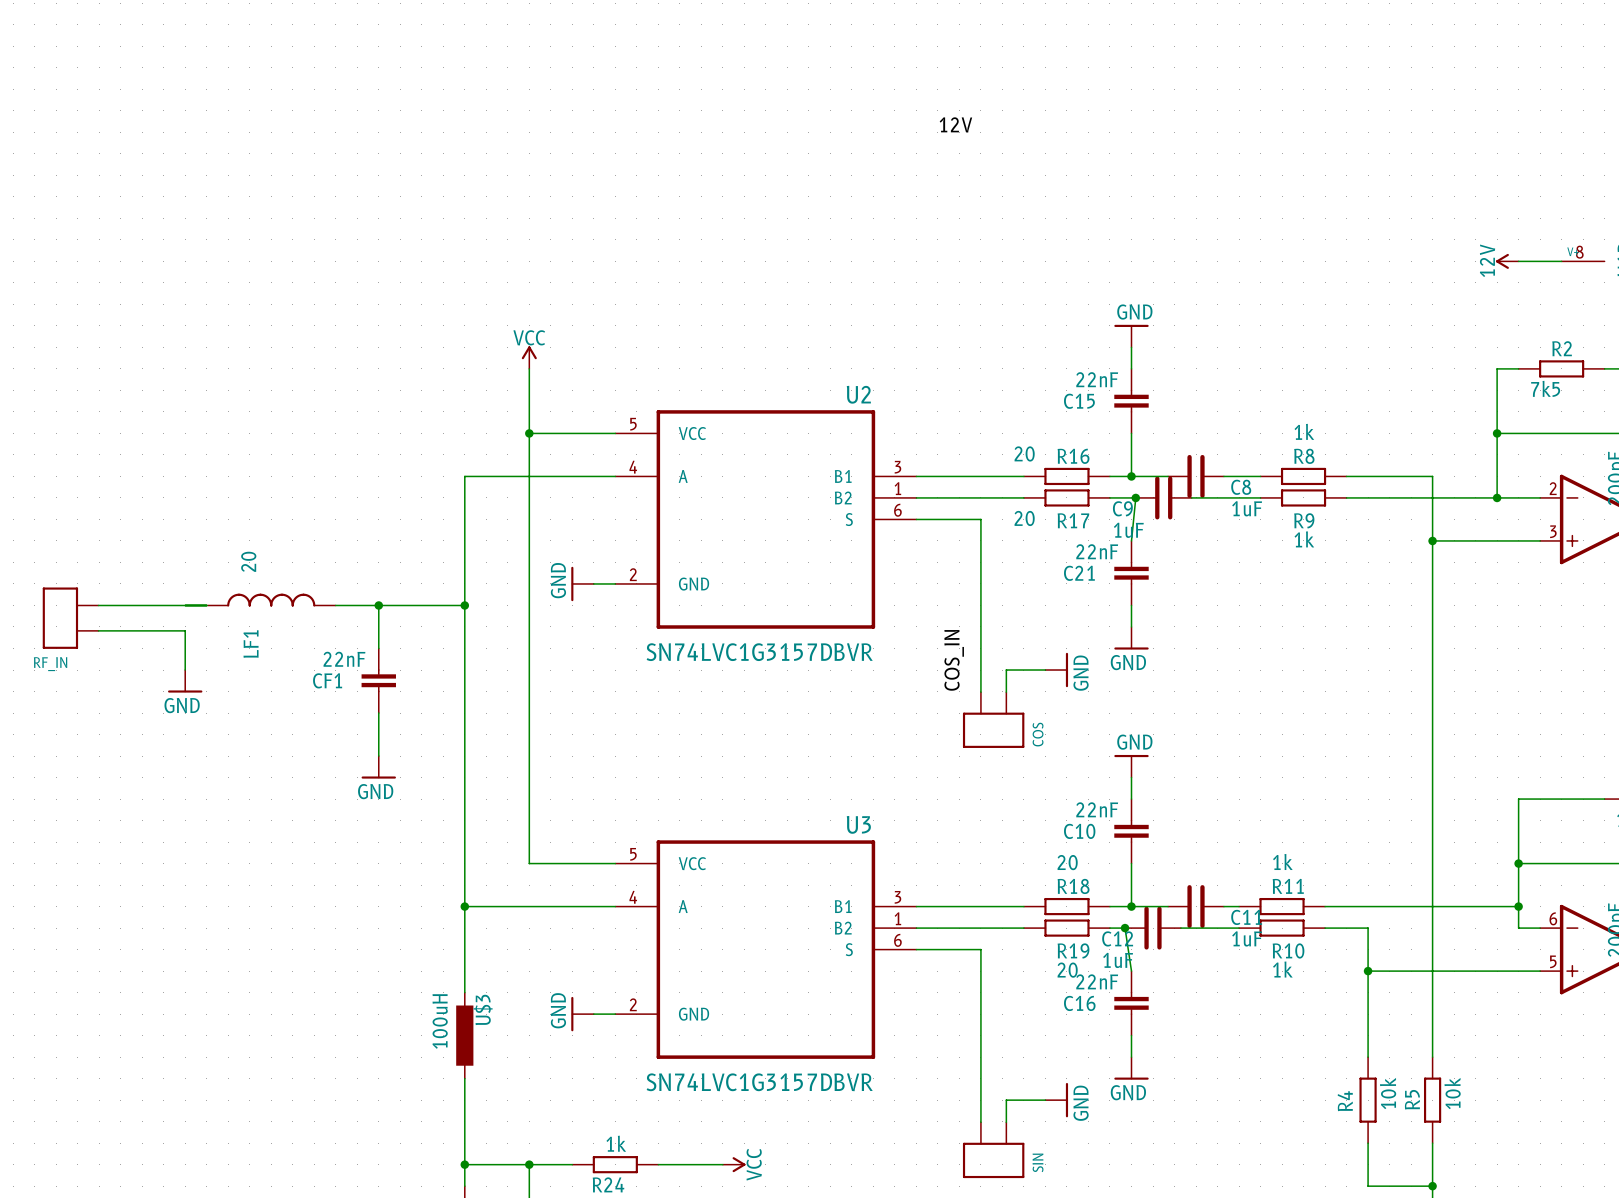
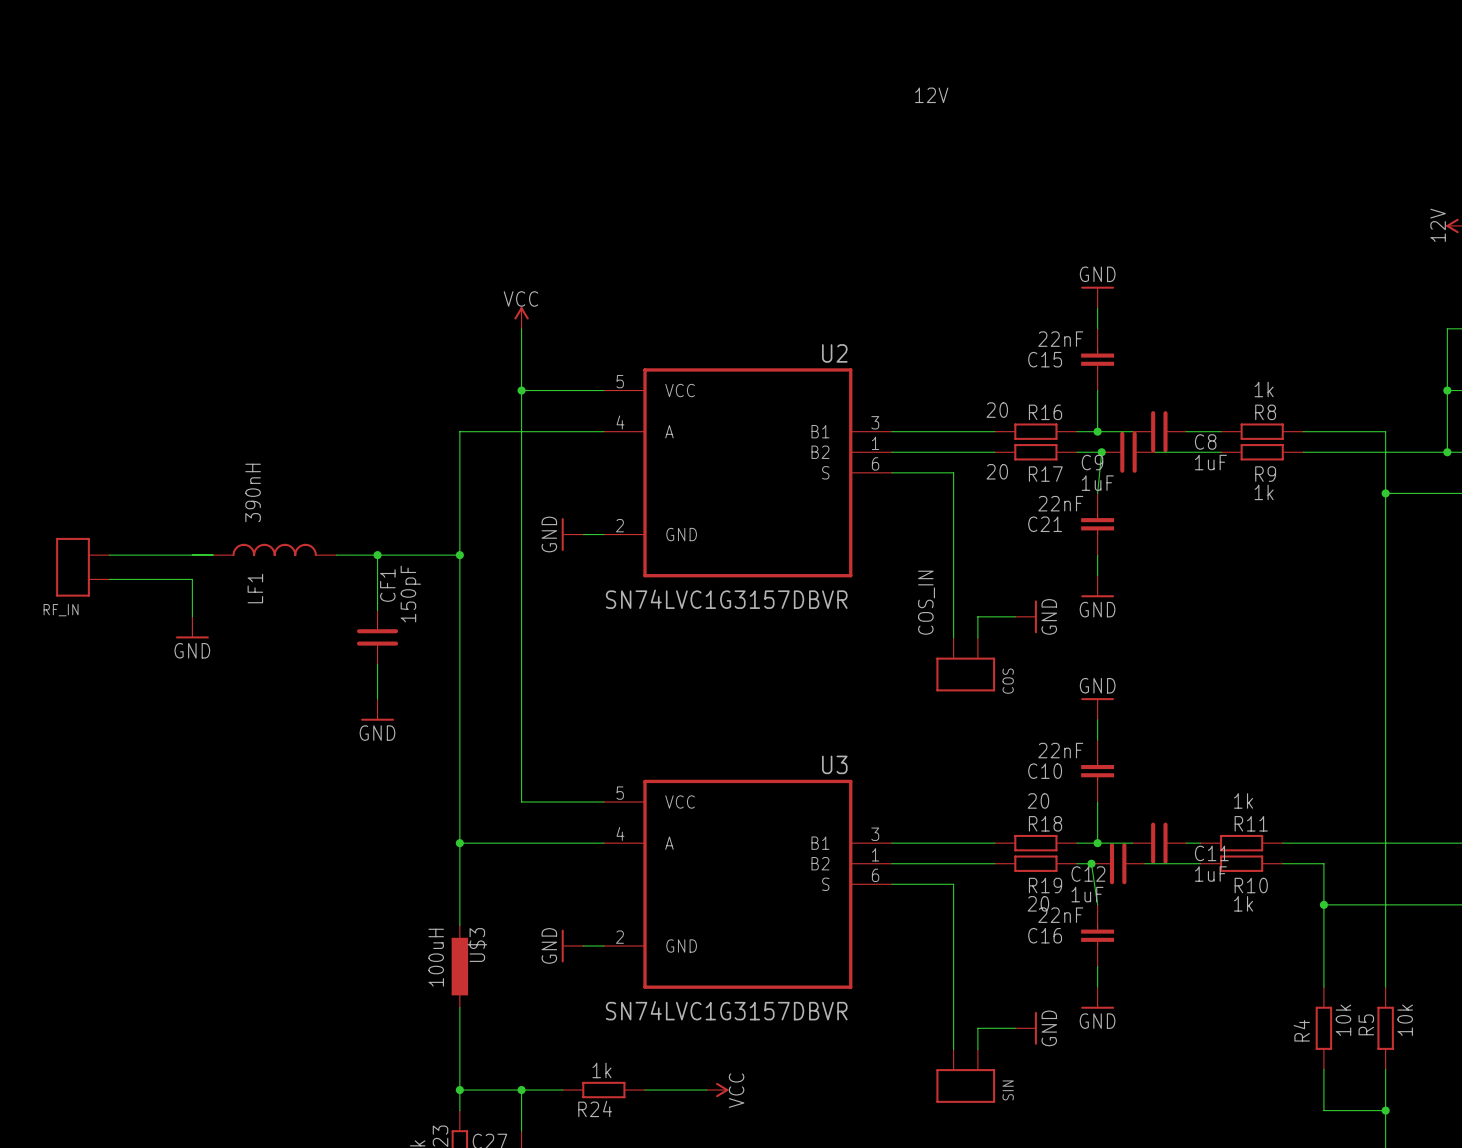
LF1 value: 20 (248, 561) -> 390nH (253, 492)
CF1 symbol: [361, 648, 396, 714] -> [356, 610, 399, 665]
CF1 value: 22nF (344, 659) -> 150pF (410, 594)
CF1 name position: CF1 (327, 680) -> CF1 (387, 585)

